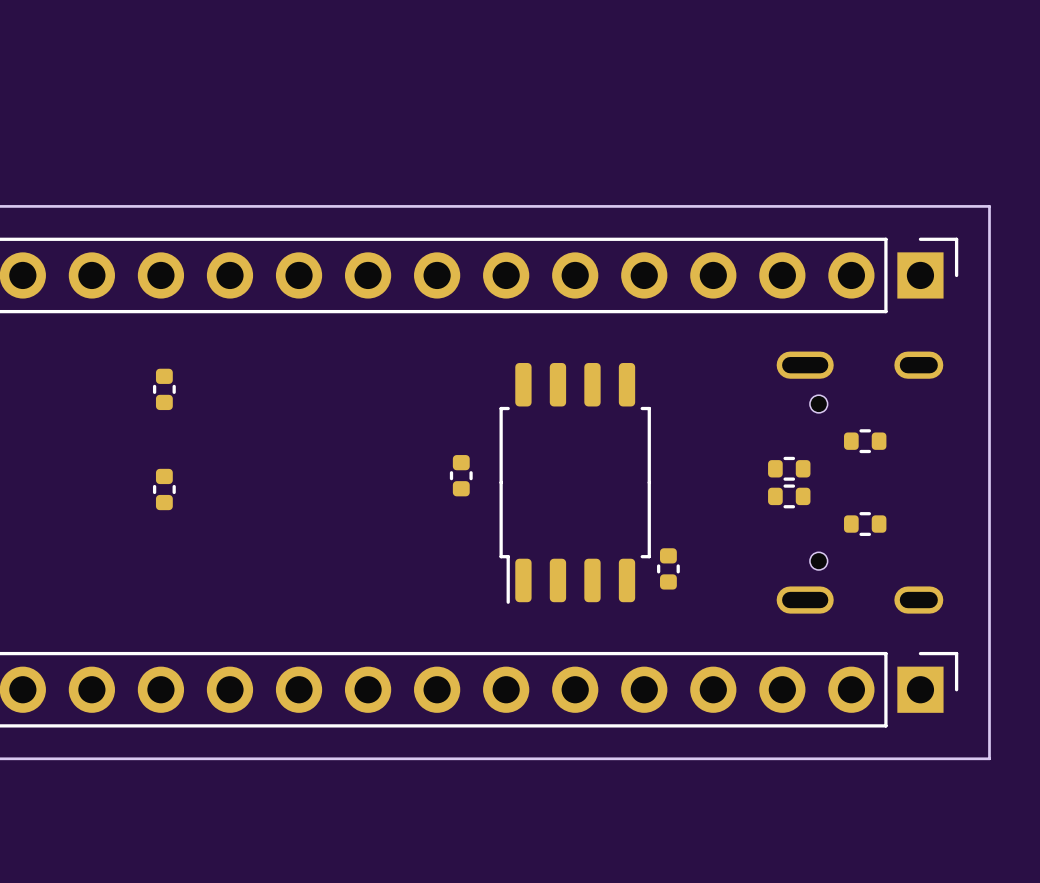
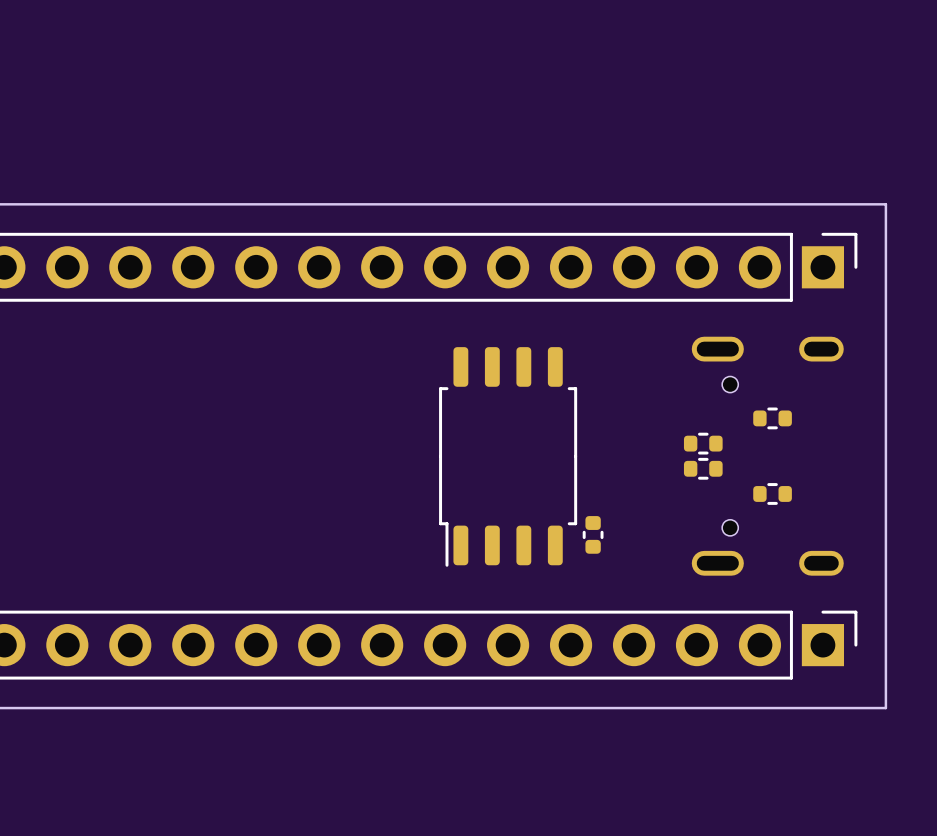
part: (164, 389) -> none
part: (461, 475) -> none
part: (164, 489) -> none

